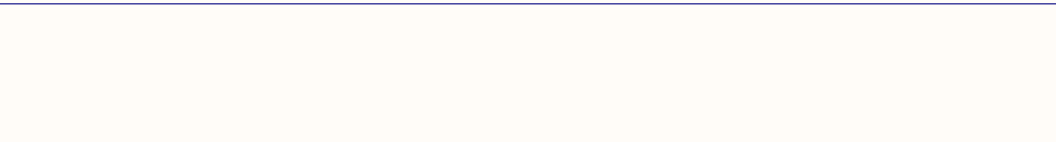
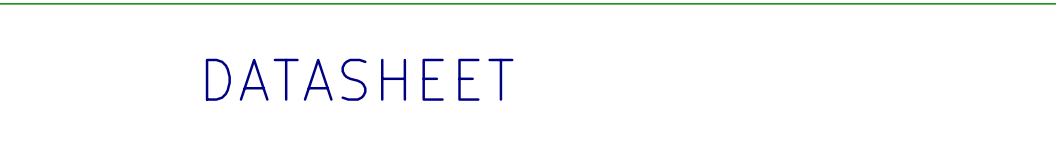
text: none -> DATASHEET (359, 79)

